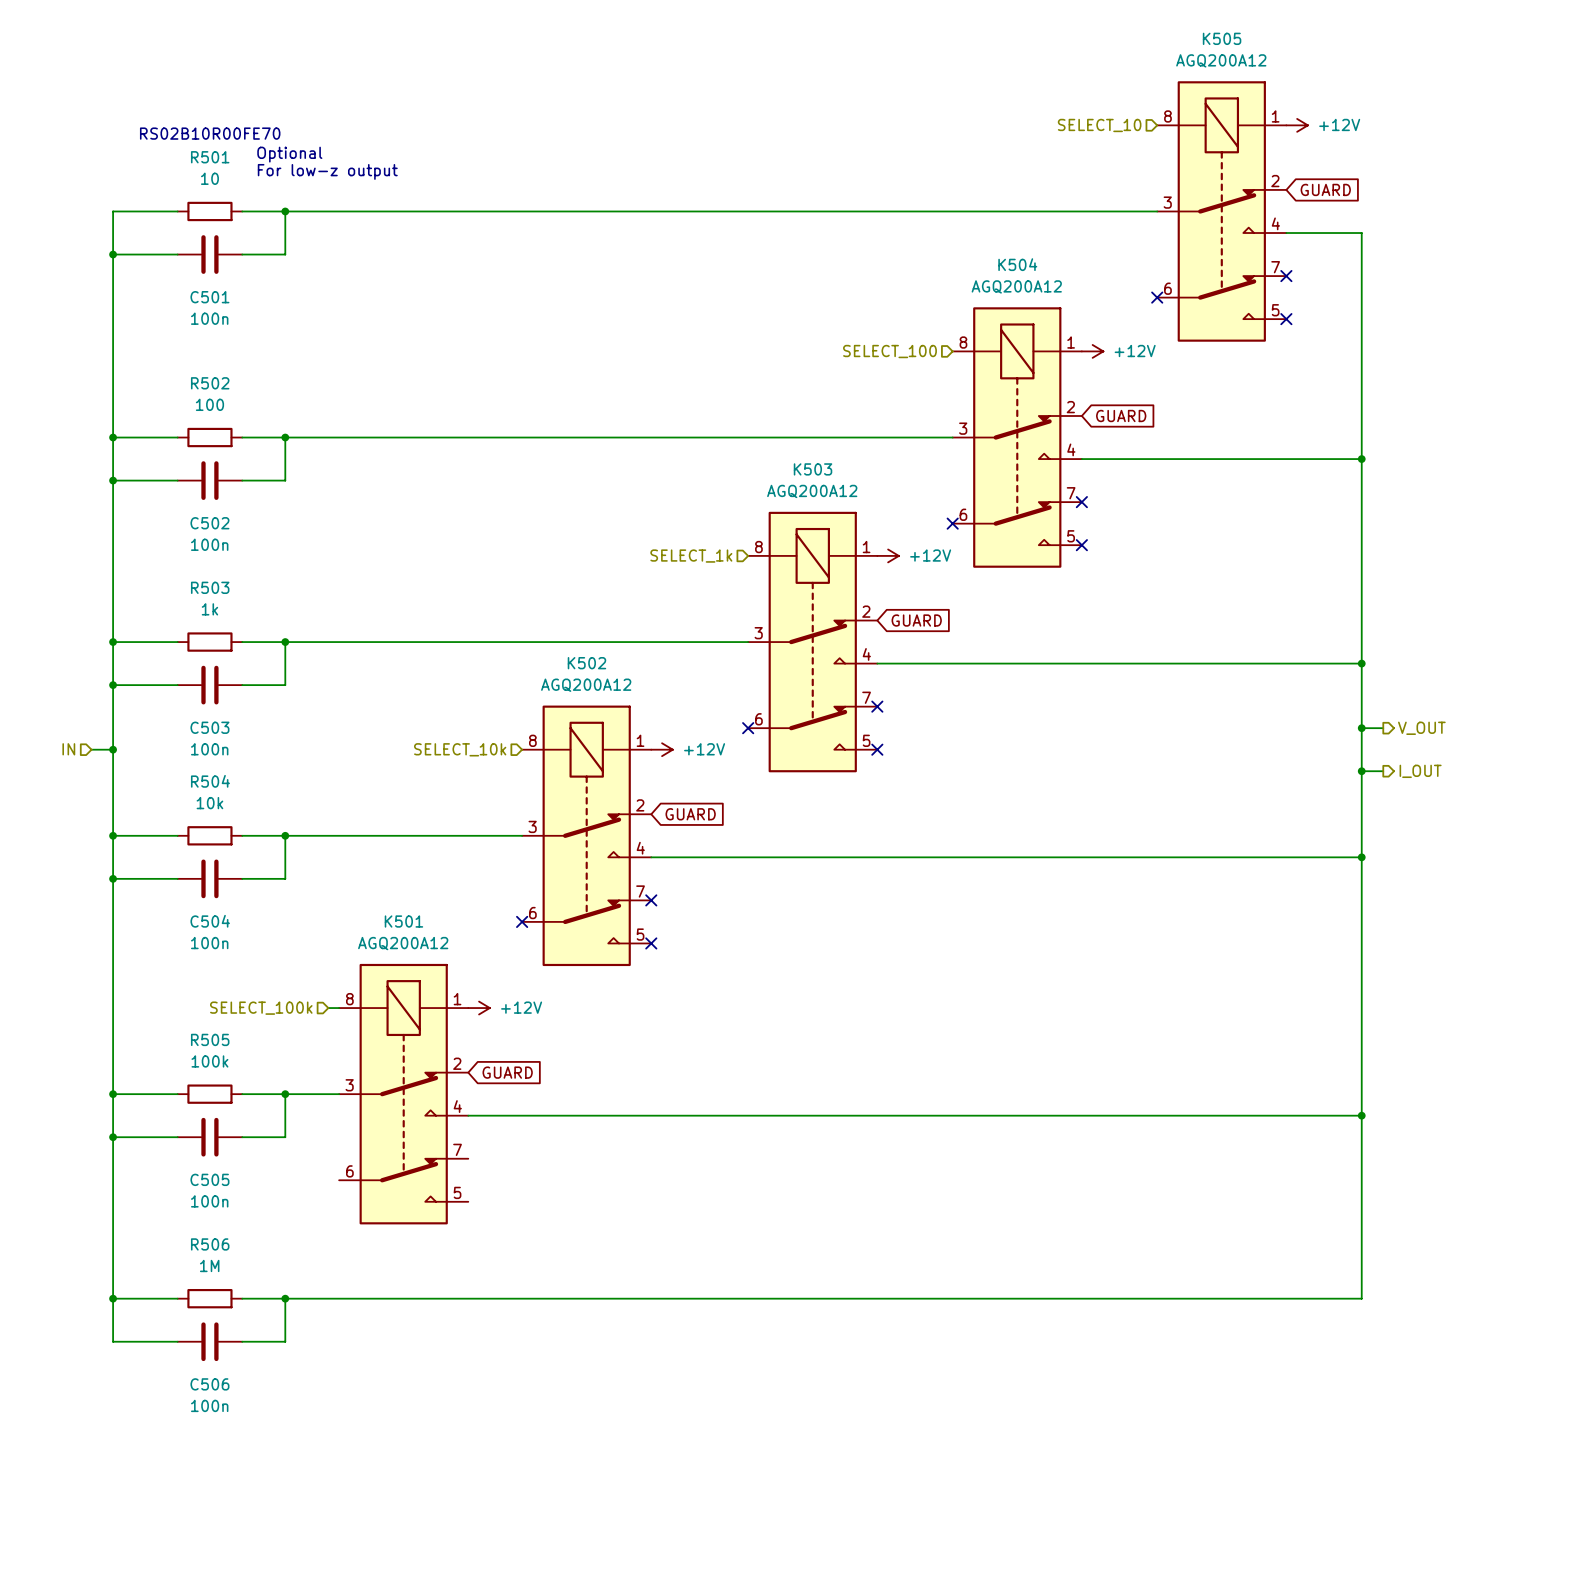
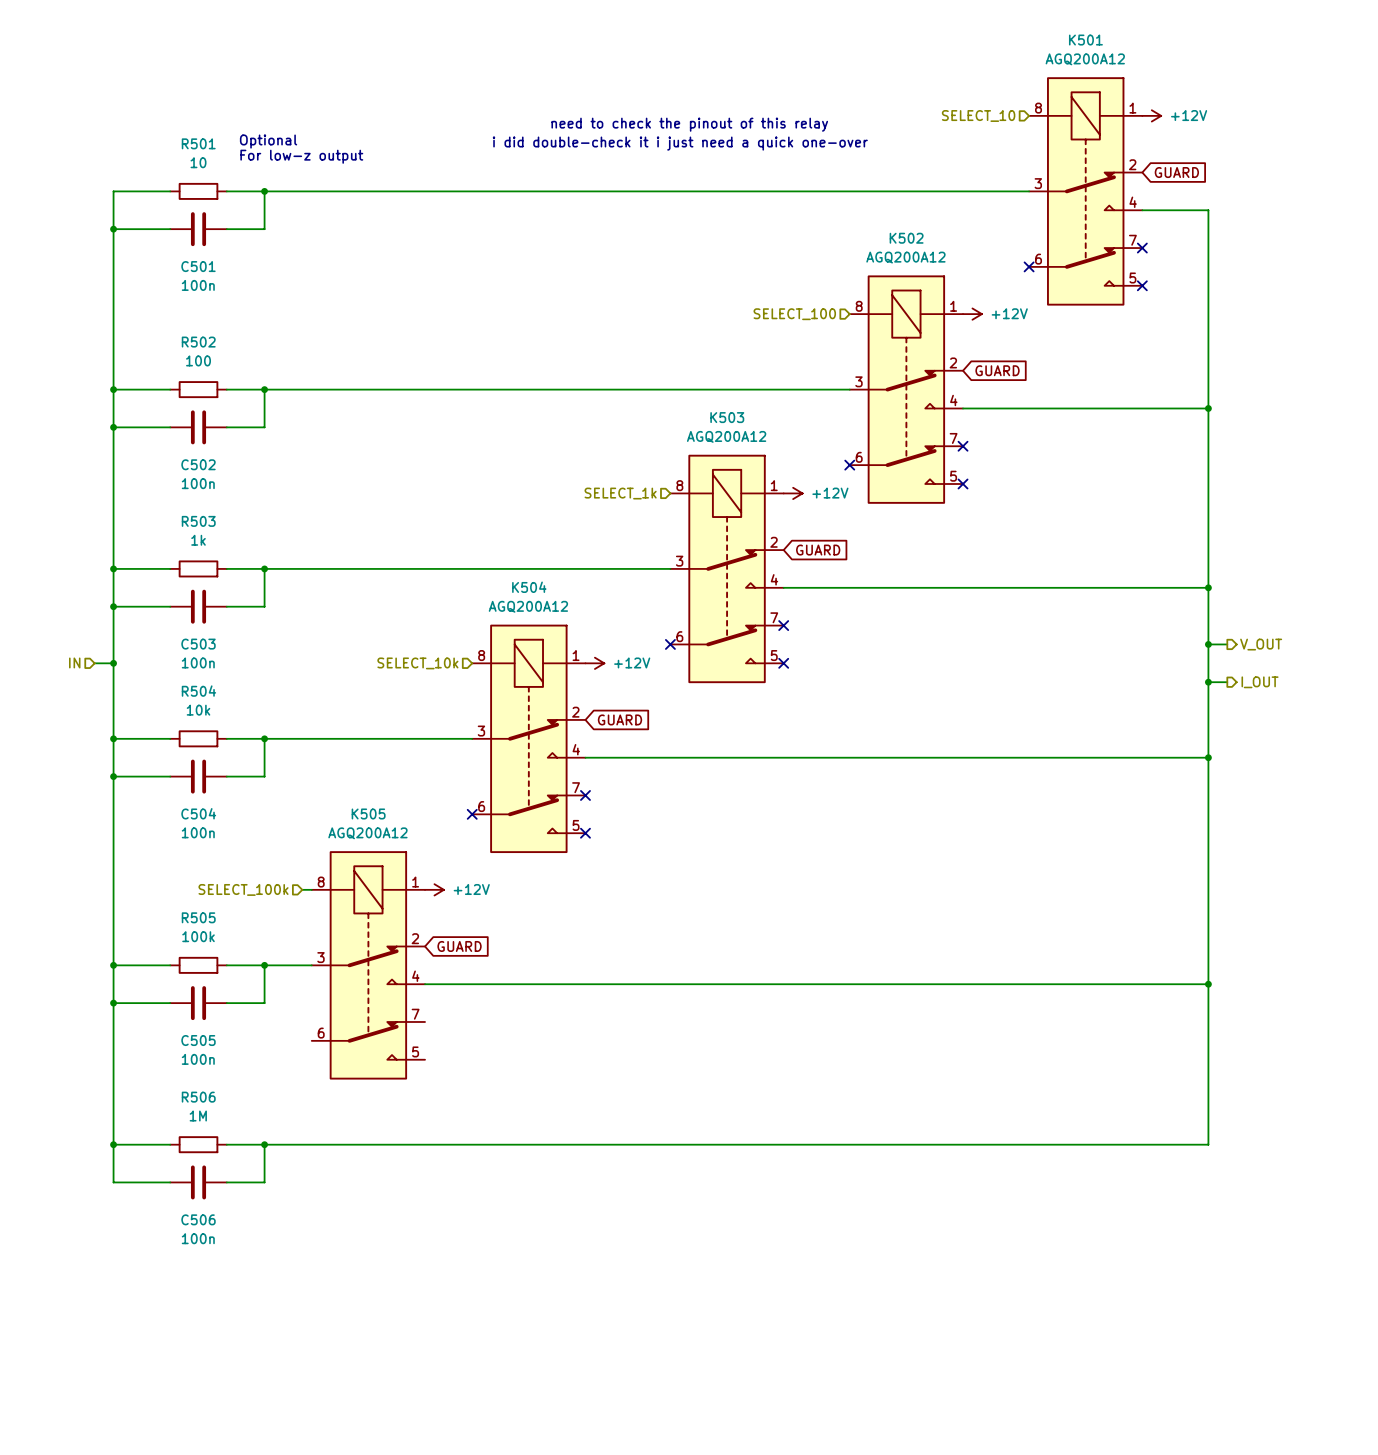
K505 name: K505 (1222, 38) -> K501 (1085, 40)
text: RS02B10R00FE70 (210, 133) -> none
text: none -> need to check the pinout of this relay (689, 124)
text: none -> i did double-check it i just need a quick one-over (680, 143)
K504 name: K504 (1017, 264) -> K502 (906, 238)
K502 name: K502 (586, 663) -> K504 (529, 587)
K501 name: K501 (403, 921) -> K505 (368, 813)

